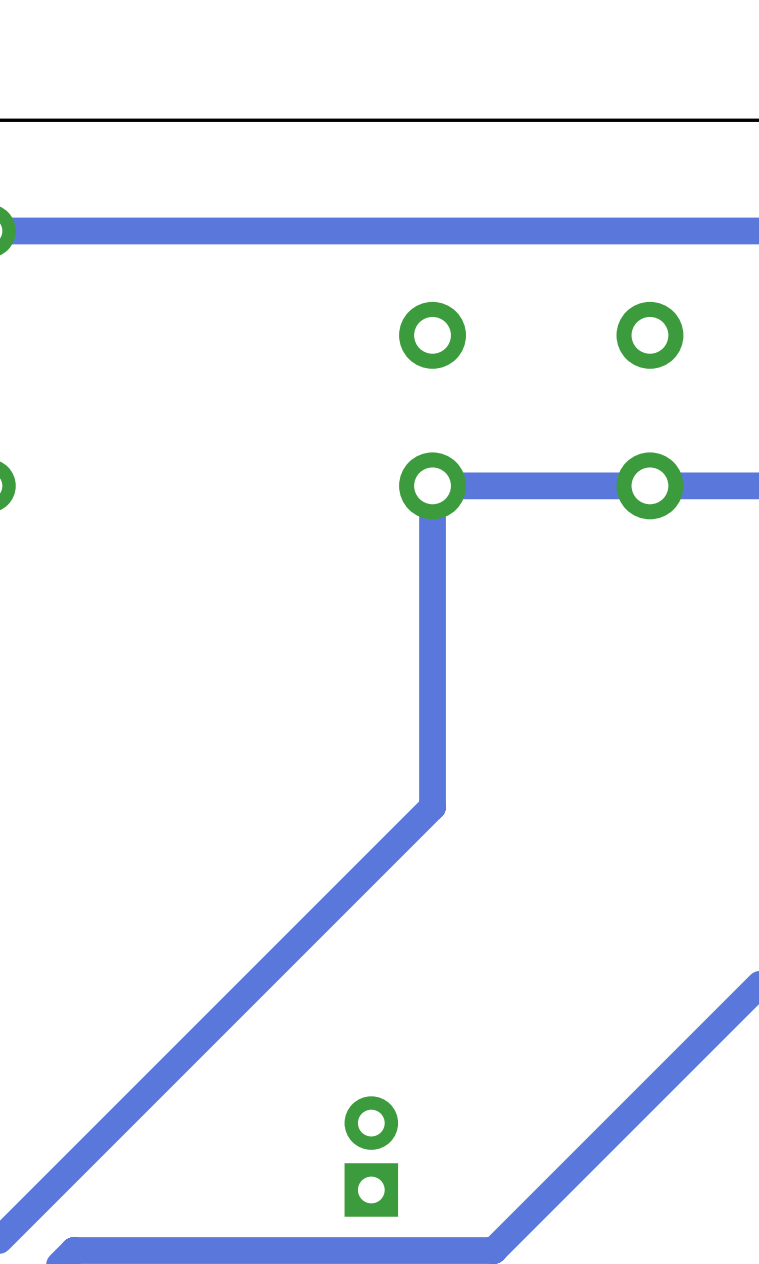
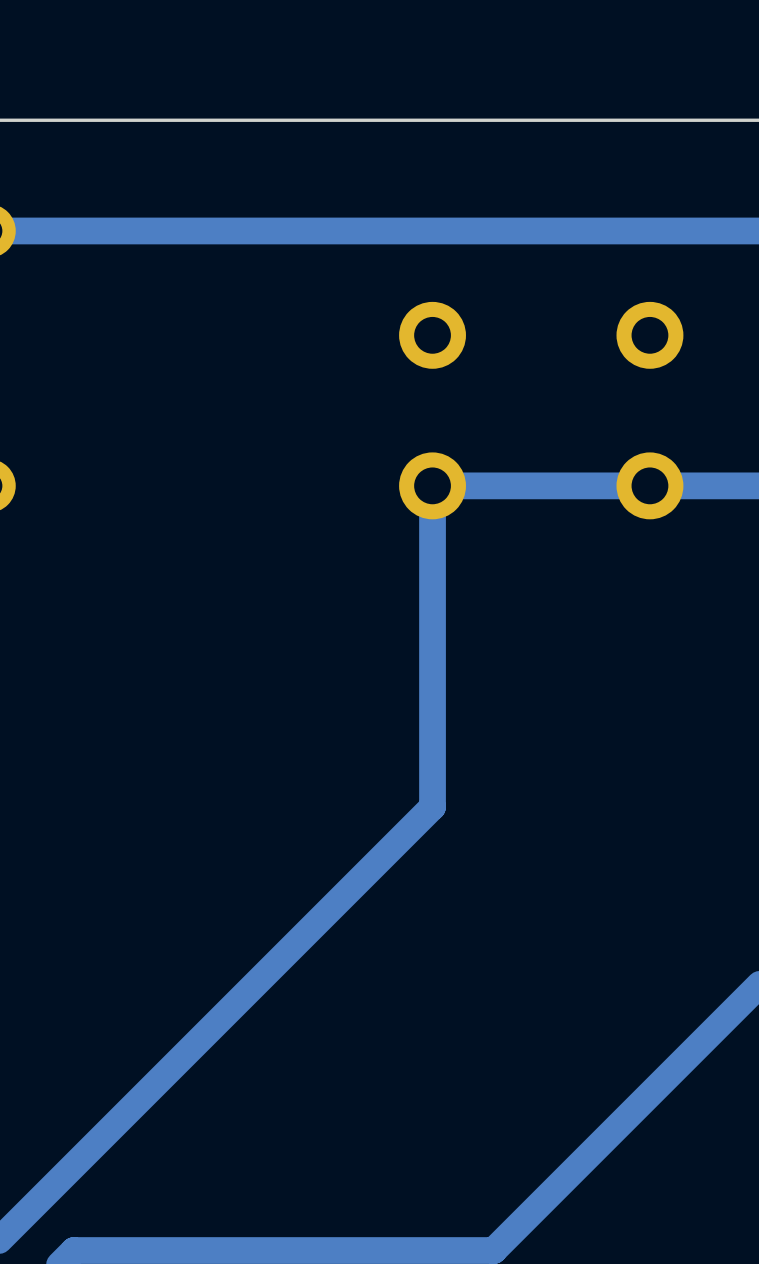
part: (371, 1156) -> none

